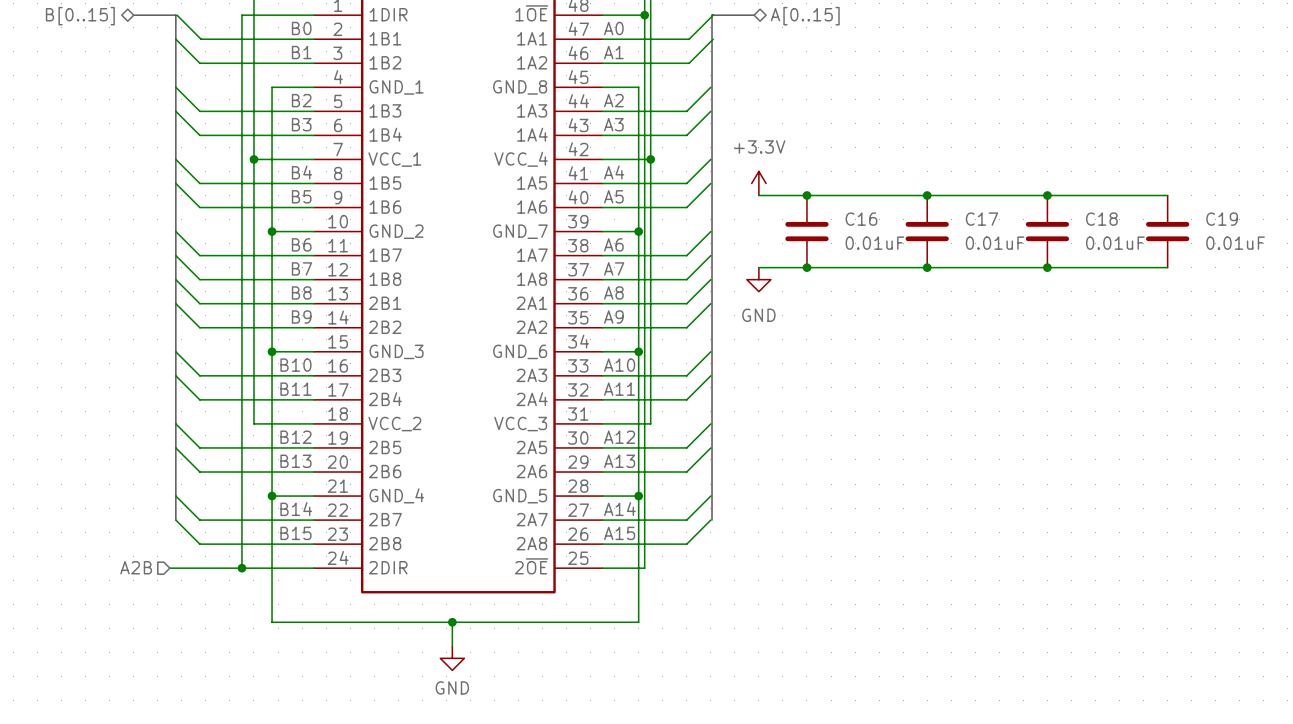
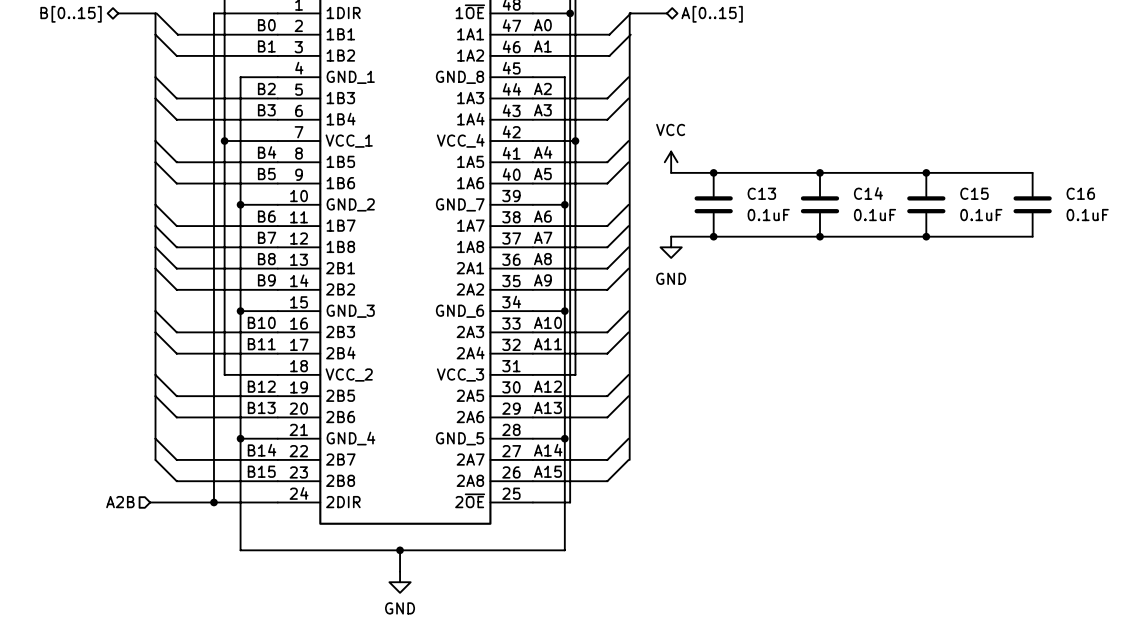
power symbol: +3.3V (758, 183) -> VCC (671, 162)
C16 name: C16 (861, 219) -> C13 (761, 193)
C17 name: C17 (981, 219) -> C14 (868, 193)
C18 name: C18 (1101, 219) -> C15 (974, 193)
C19 name: C19 (1222, 219) -> C16 (1080, 193)
C16 value: 0.01uF (874, 243) -> 0.1uF (768, 215)
C17 value: 0.01uF (995, 243) -> 0.1uF (875, 215)
C18 value: 0.01uF (1115, 243) -> 0.1uF (981, 215)
C19 value: 0.01uF (1235, 243) -> 0.1uF (1087, 215)

